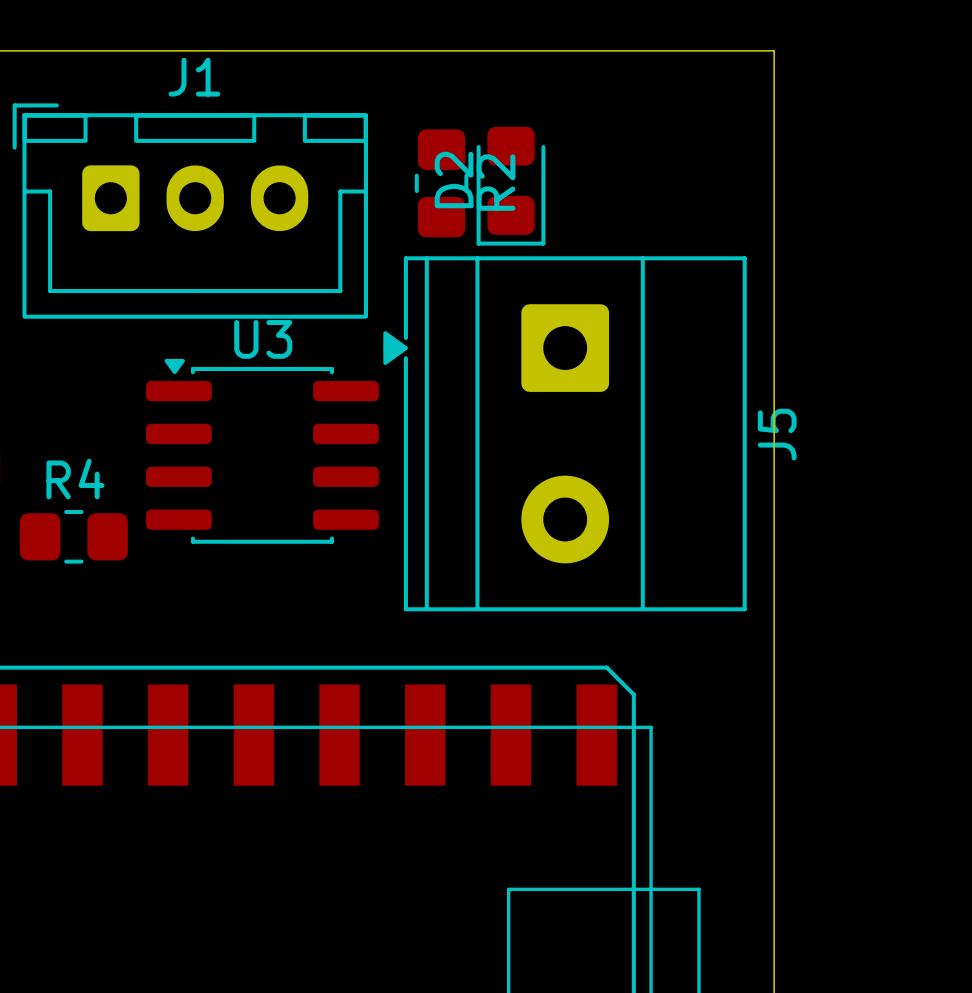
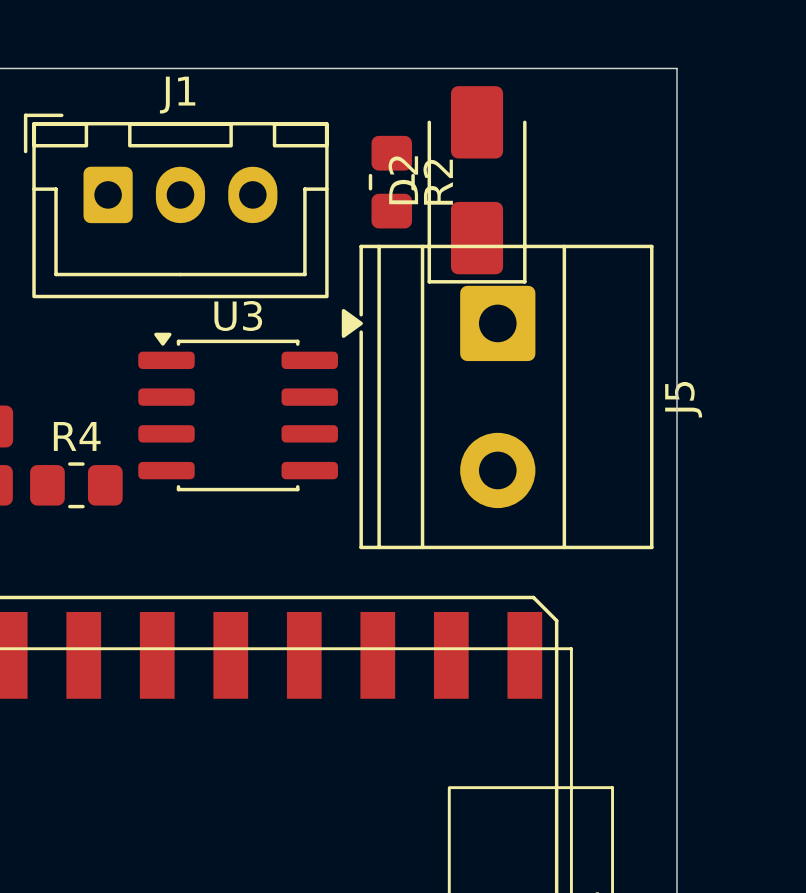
D2 footprint: [476, 126, 546, 246] -> [427, 86, 527, 284]

